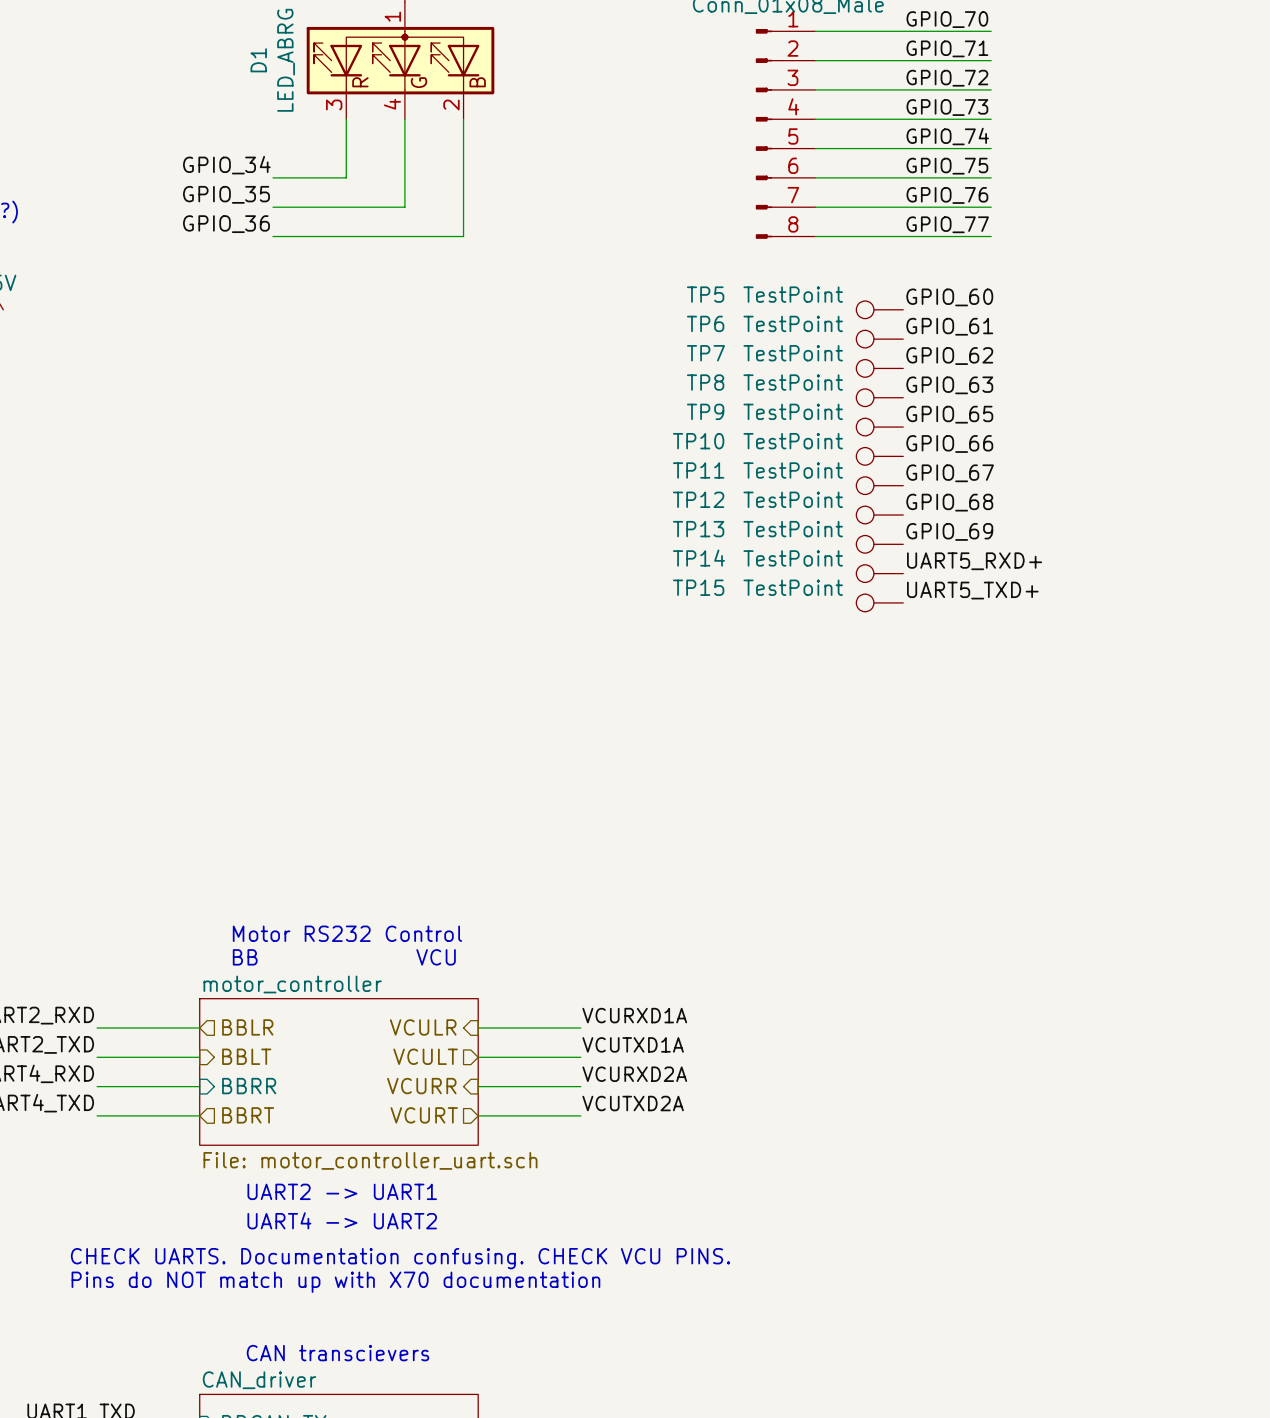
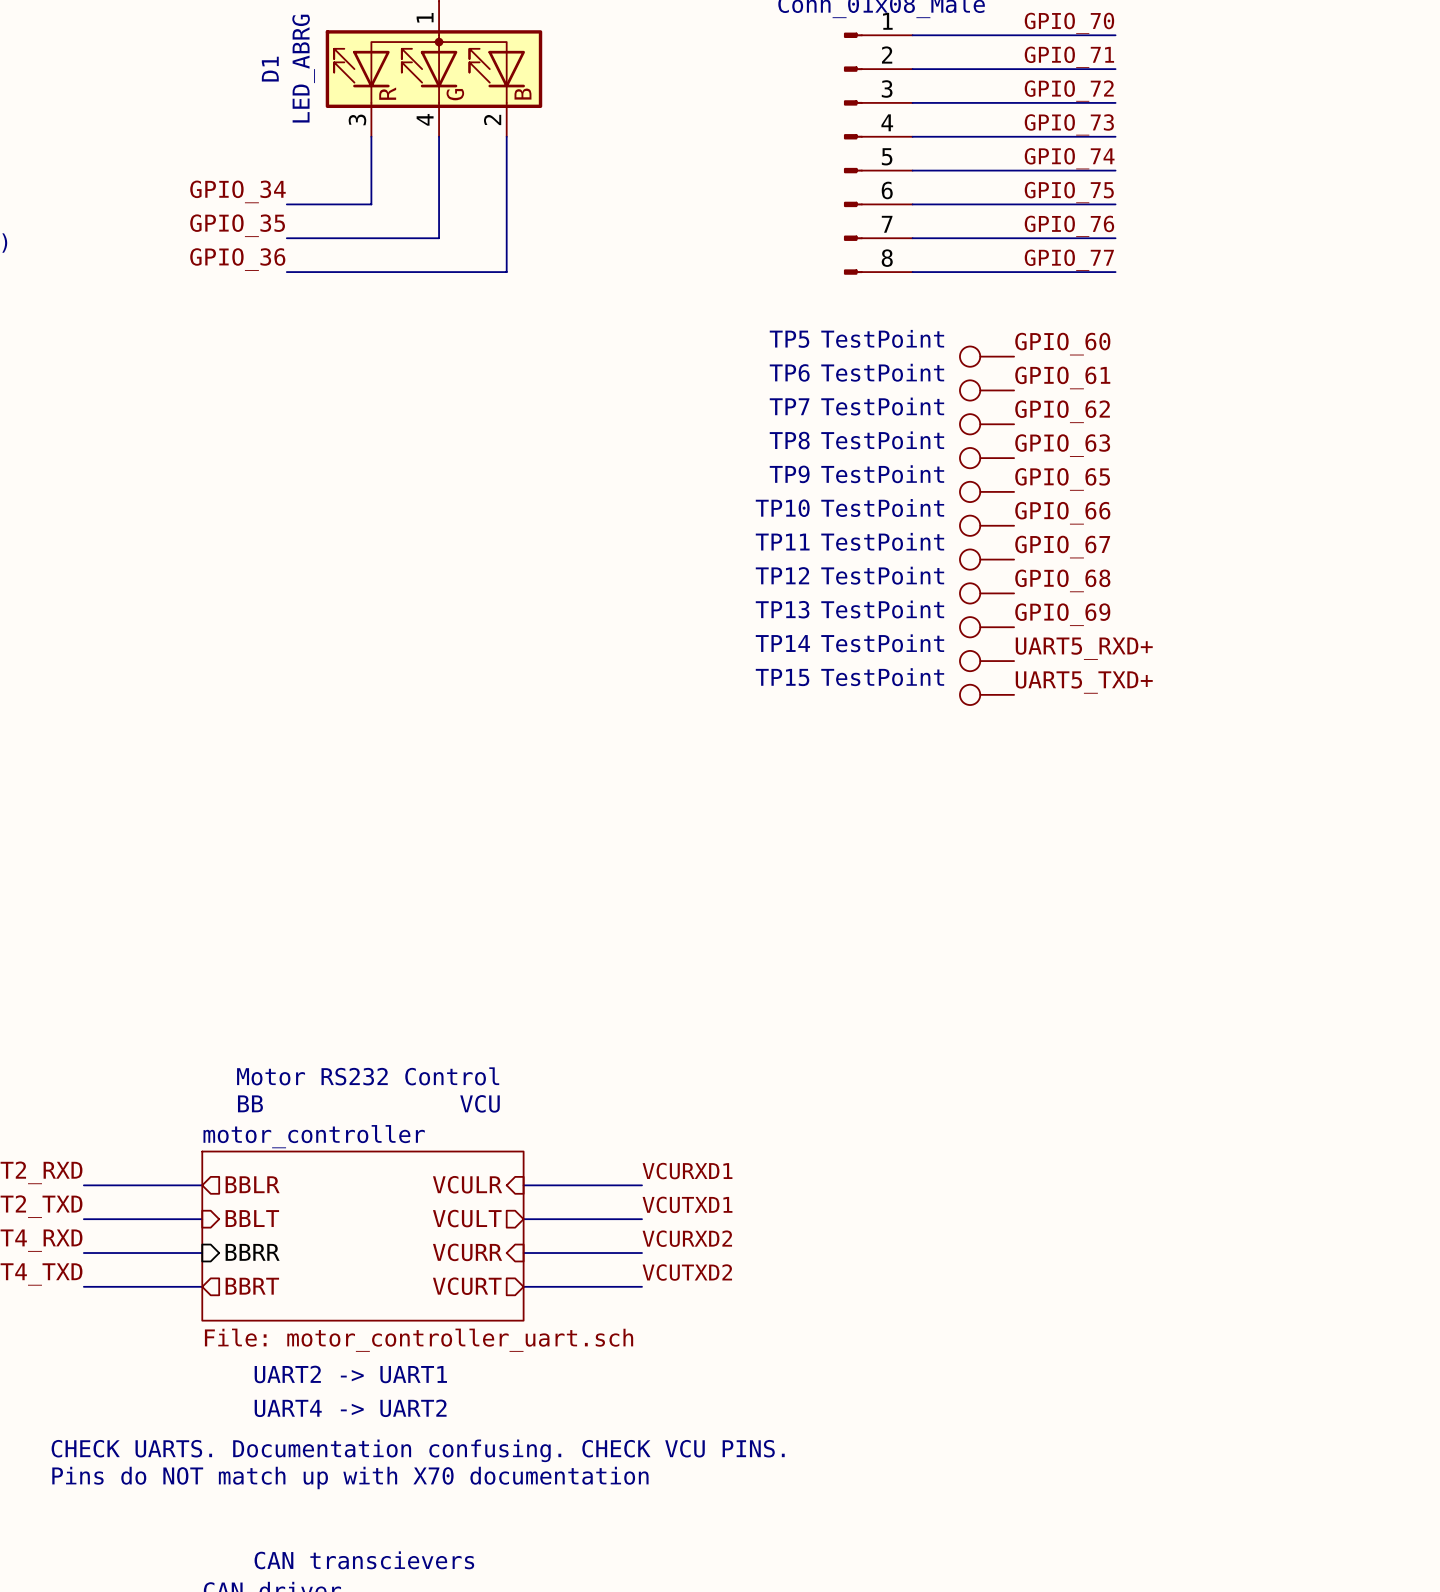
label: VCURXD1A (634, 1015) -> VCURXD1 (687, 1171)
label: VCUTXD1A (633, 1044) -> VCUTXD1 (687, 1204)
label: VCURXD2A (634, 1074) -> VCURXD2 (687, 1238)
label: VCUTXD2A (633, 1103) -> VCUTXD2 (687, 1272)

